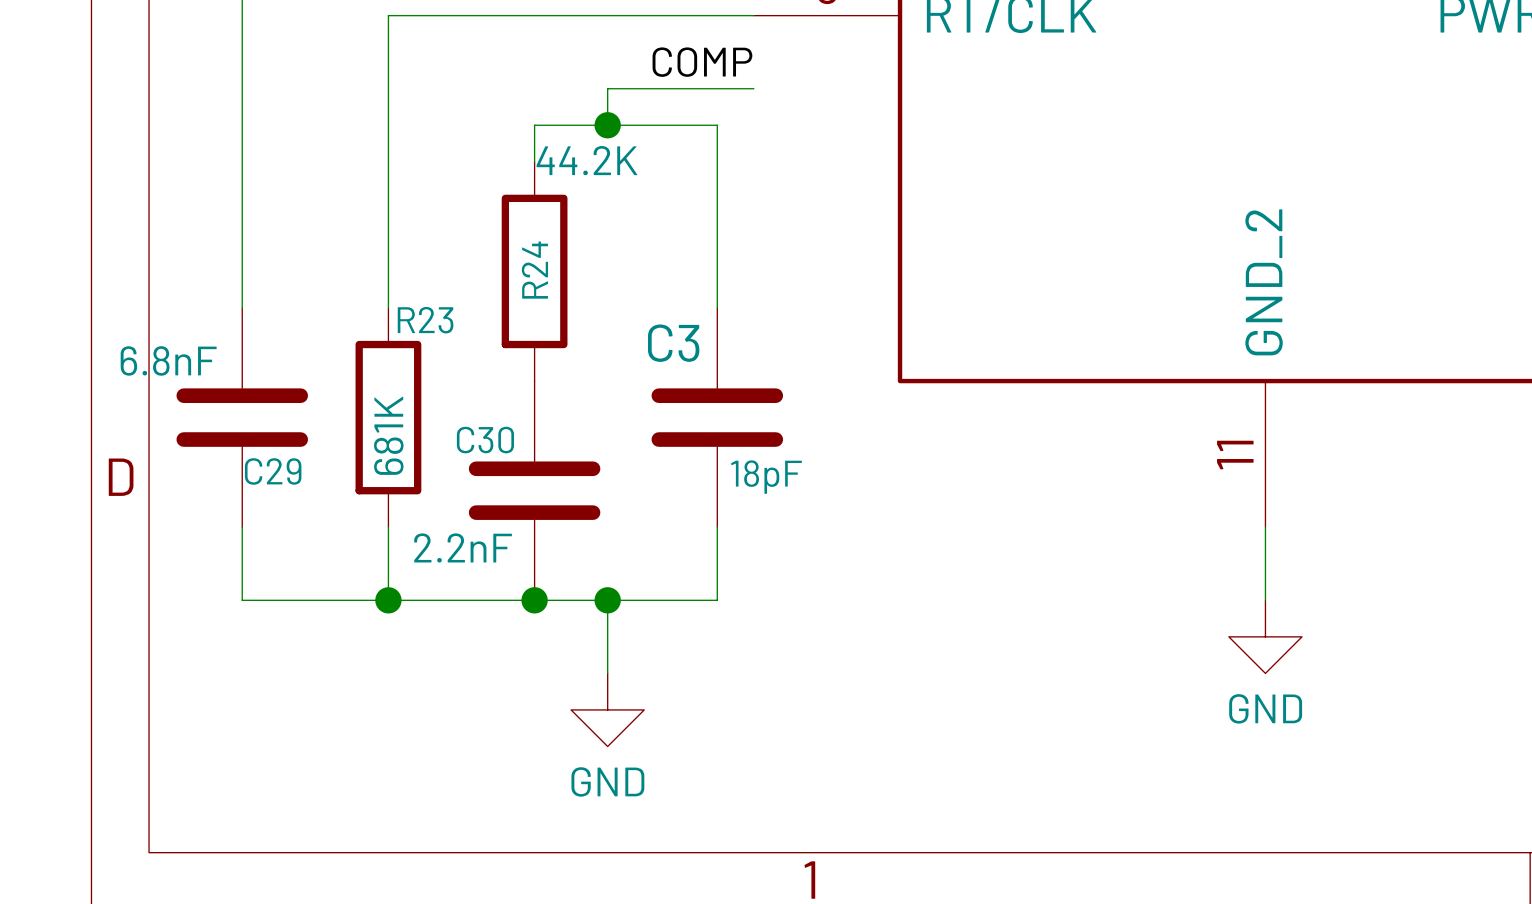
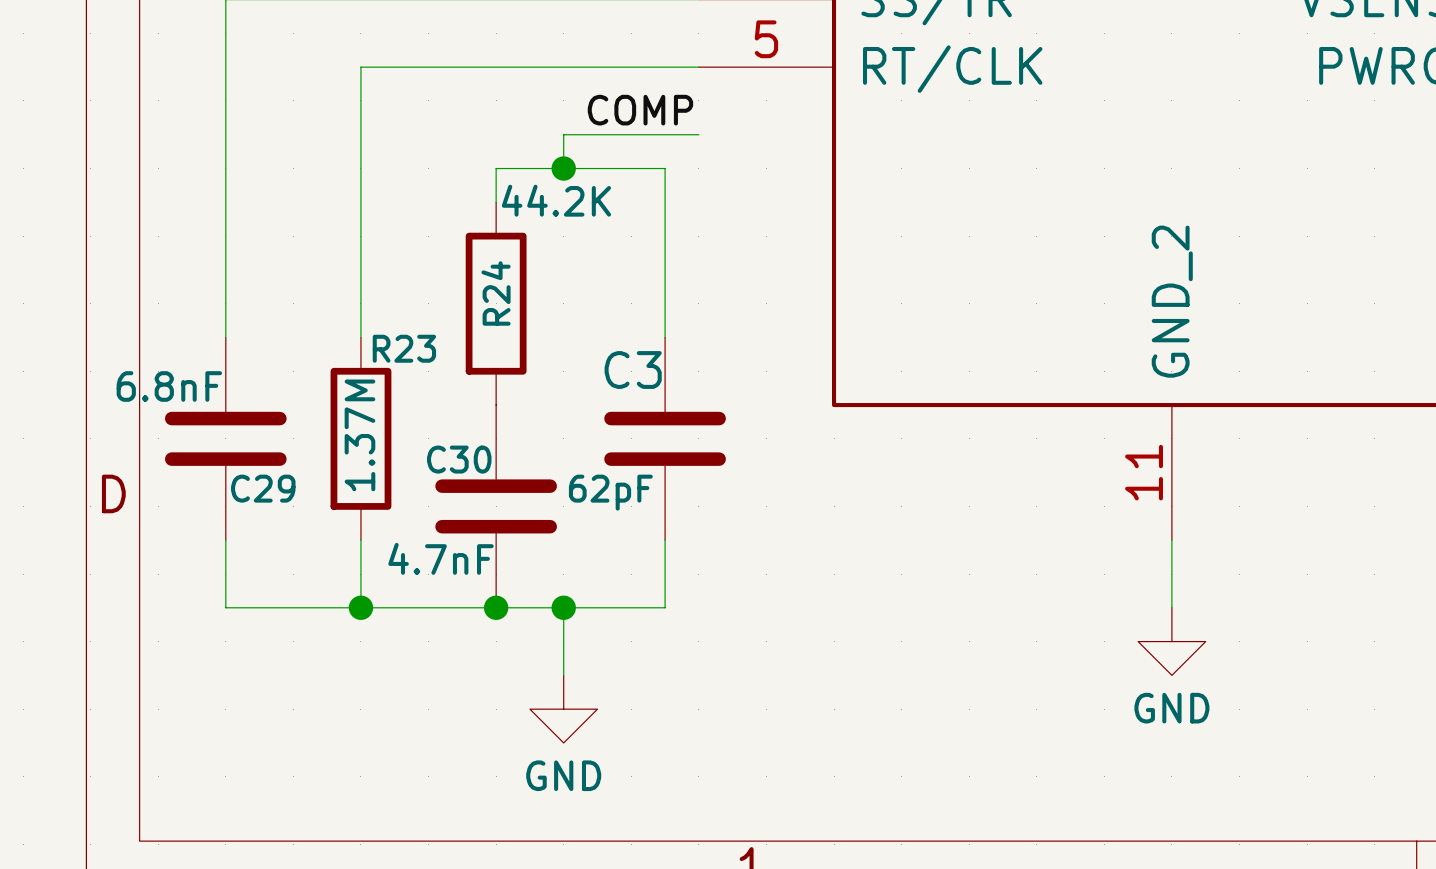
R23 value: 681K (388, 435) -> 1.37M (359, 435)
C3 value: 18pF (766, 477) -> 62pF (610, 492)
C30 value: 2.2nF (463, 547) -> 4.7nF (441, 558)

